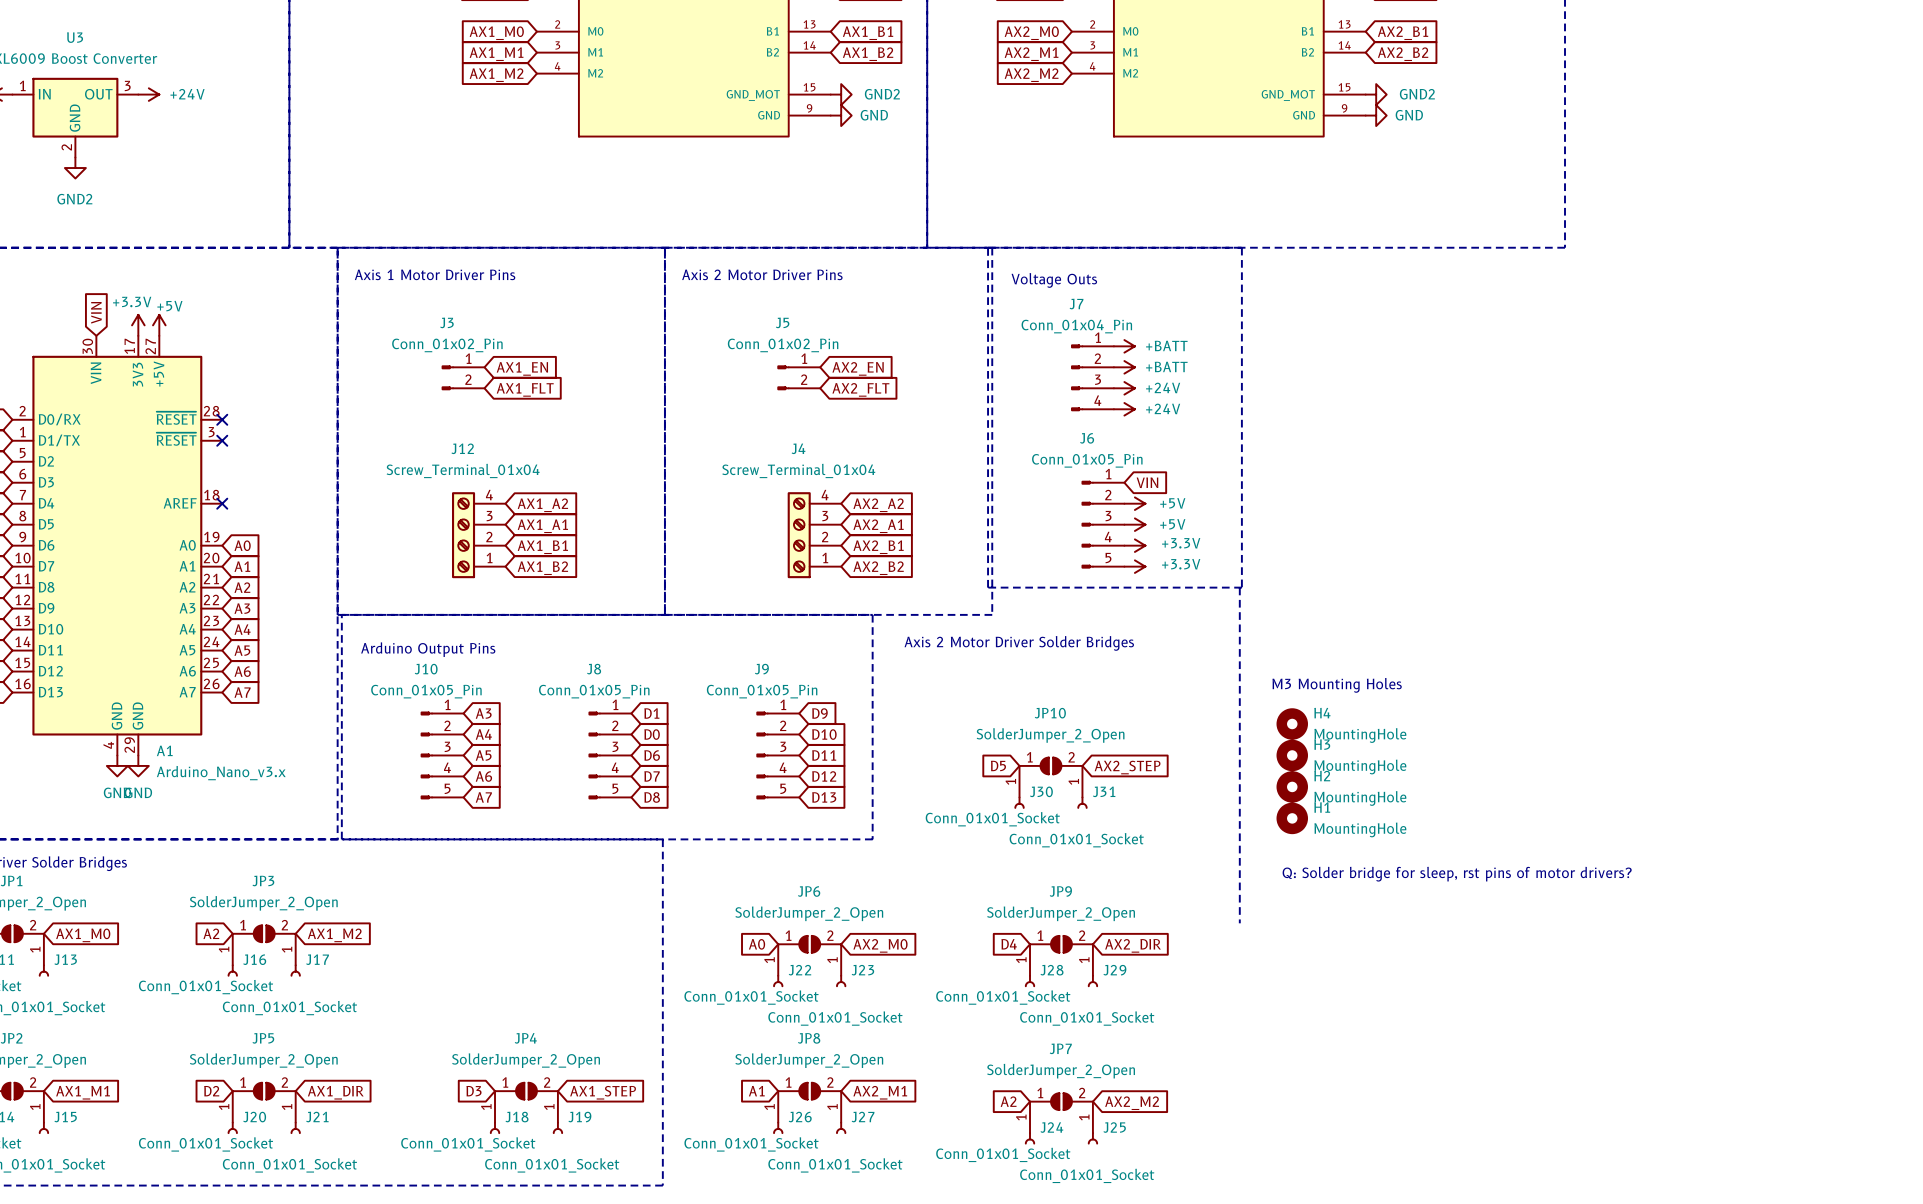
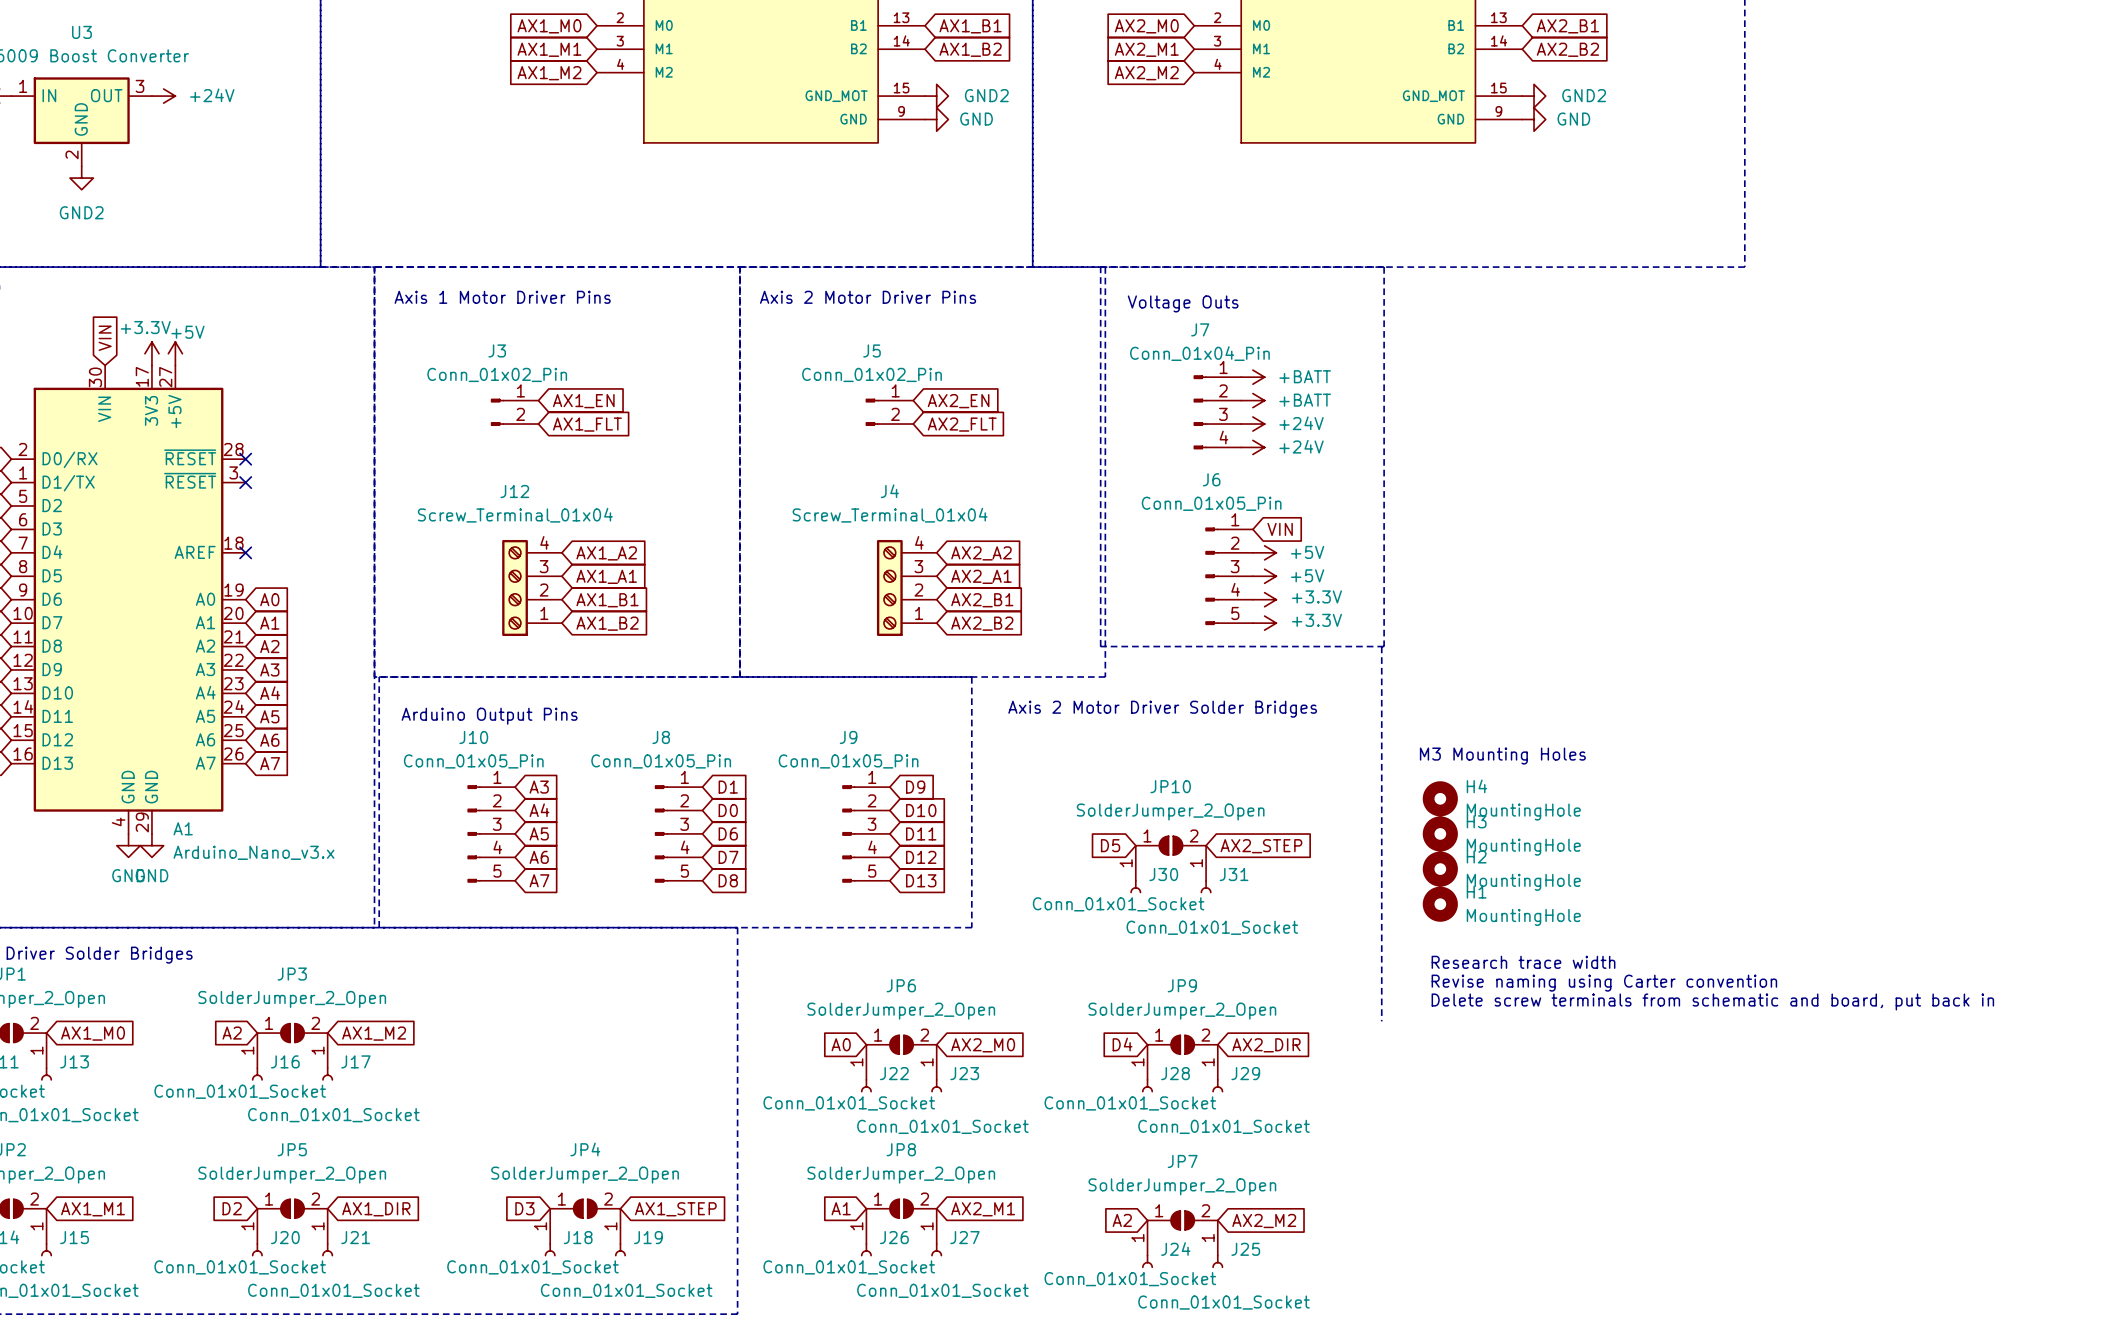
text: Q: Solder bridge for sleep, rst pins of motor drivers? (1457, 874) -> Research trace width (1523, 962)
text: none -> Revise naming using Carter convention (1604, 983)
text: none -> Delete screw terminals from schematic and board, put back in (1712, 1001)

